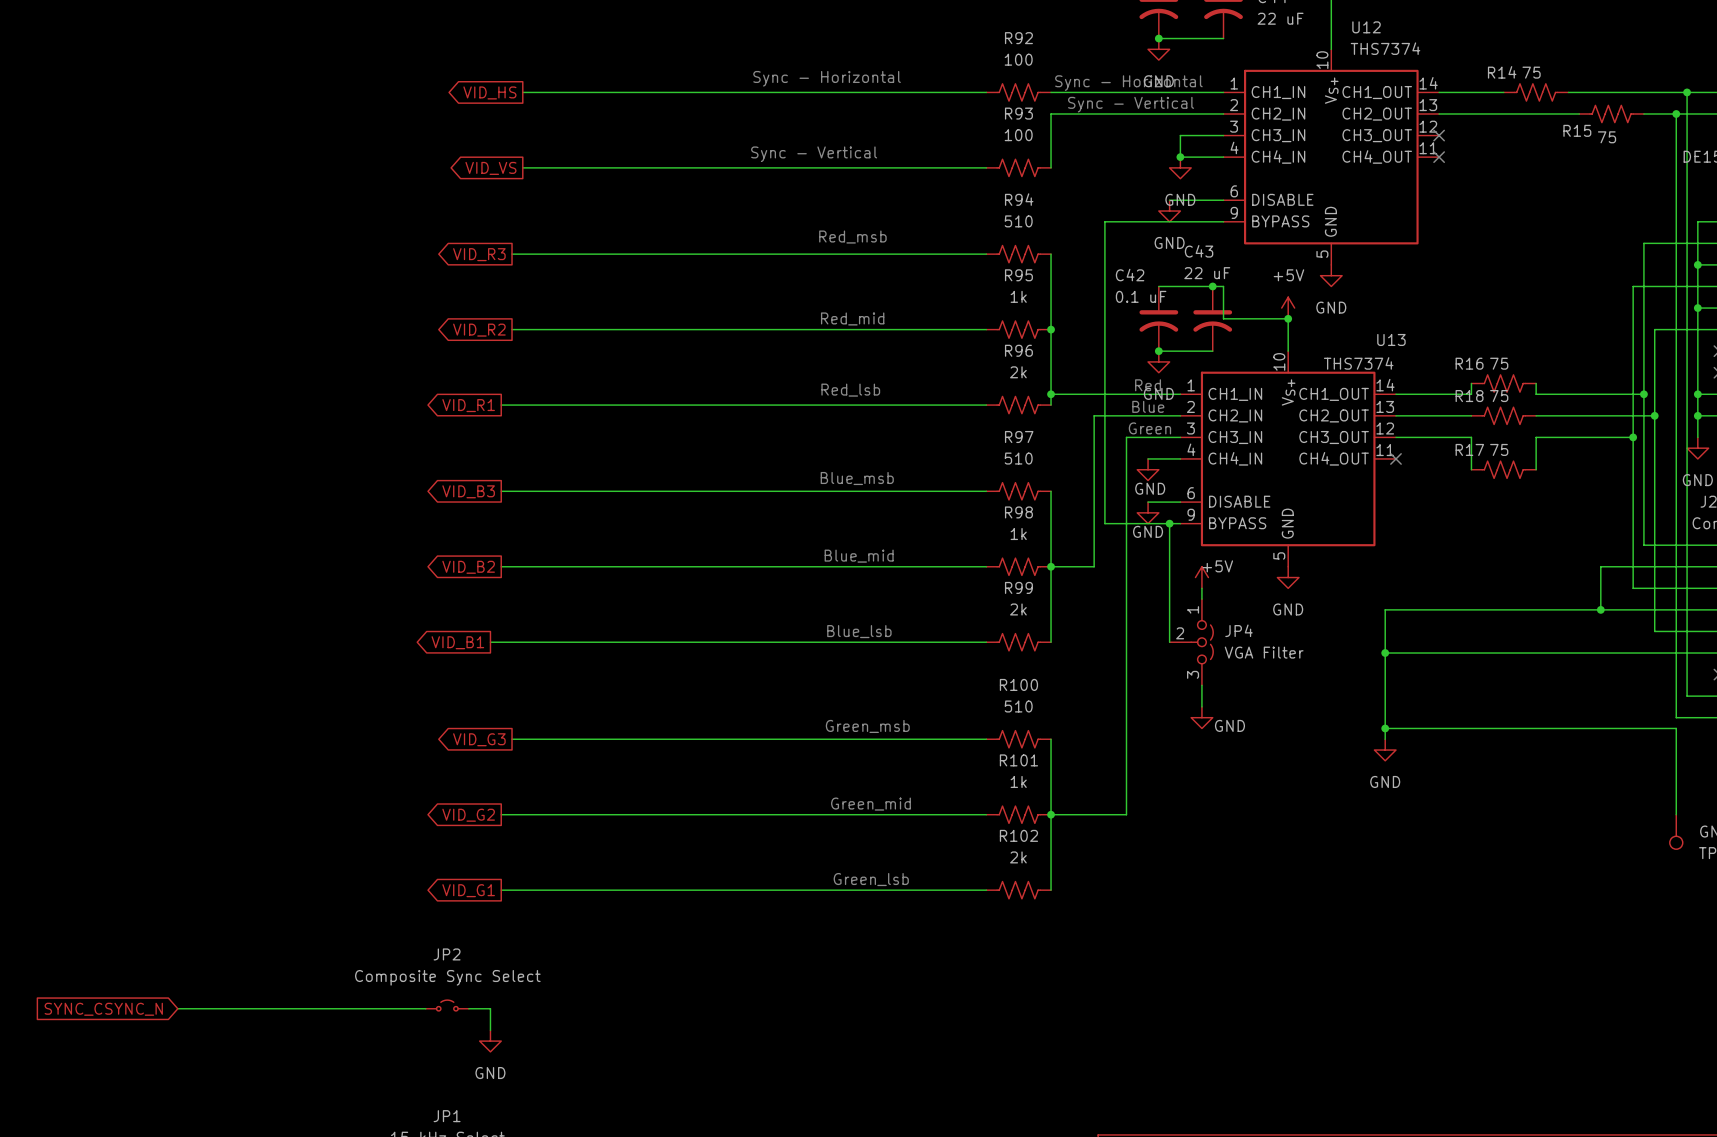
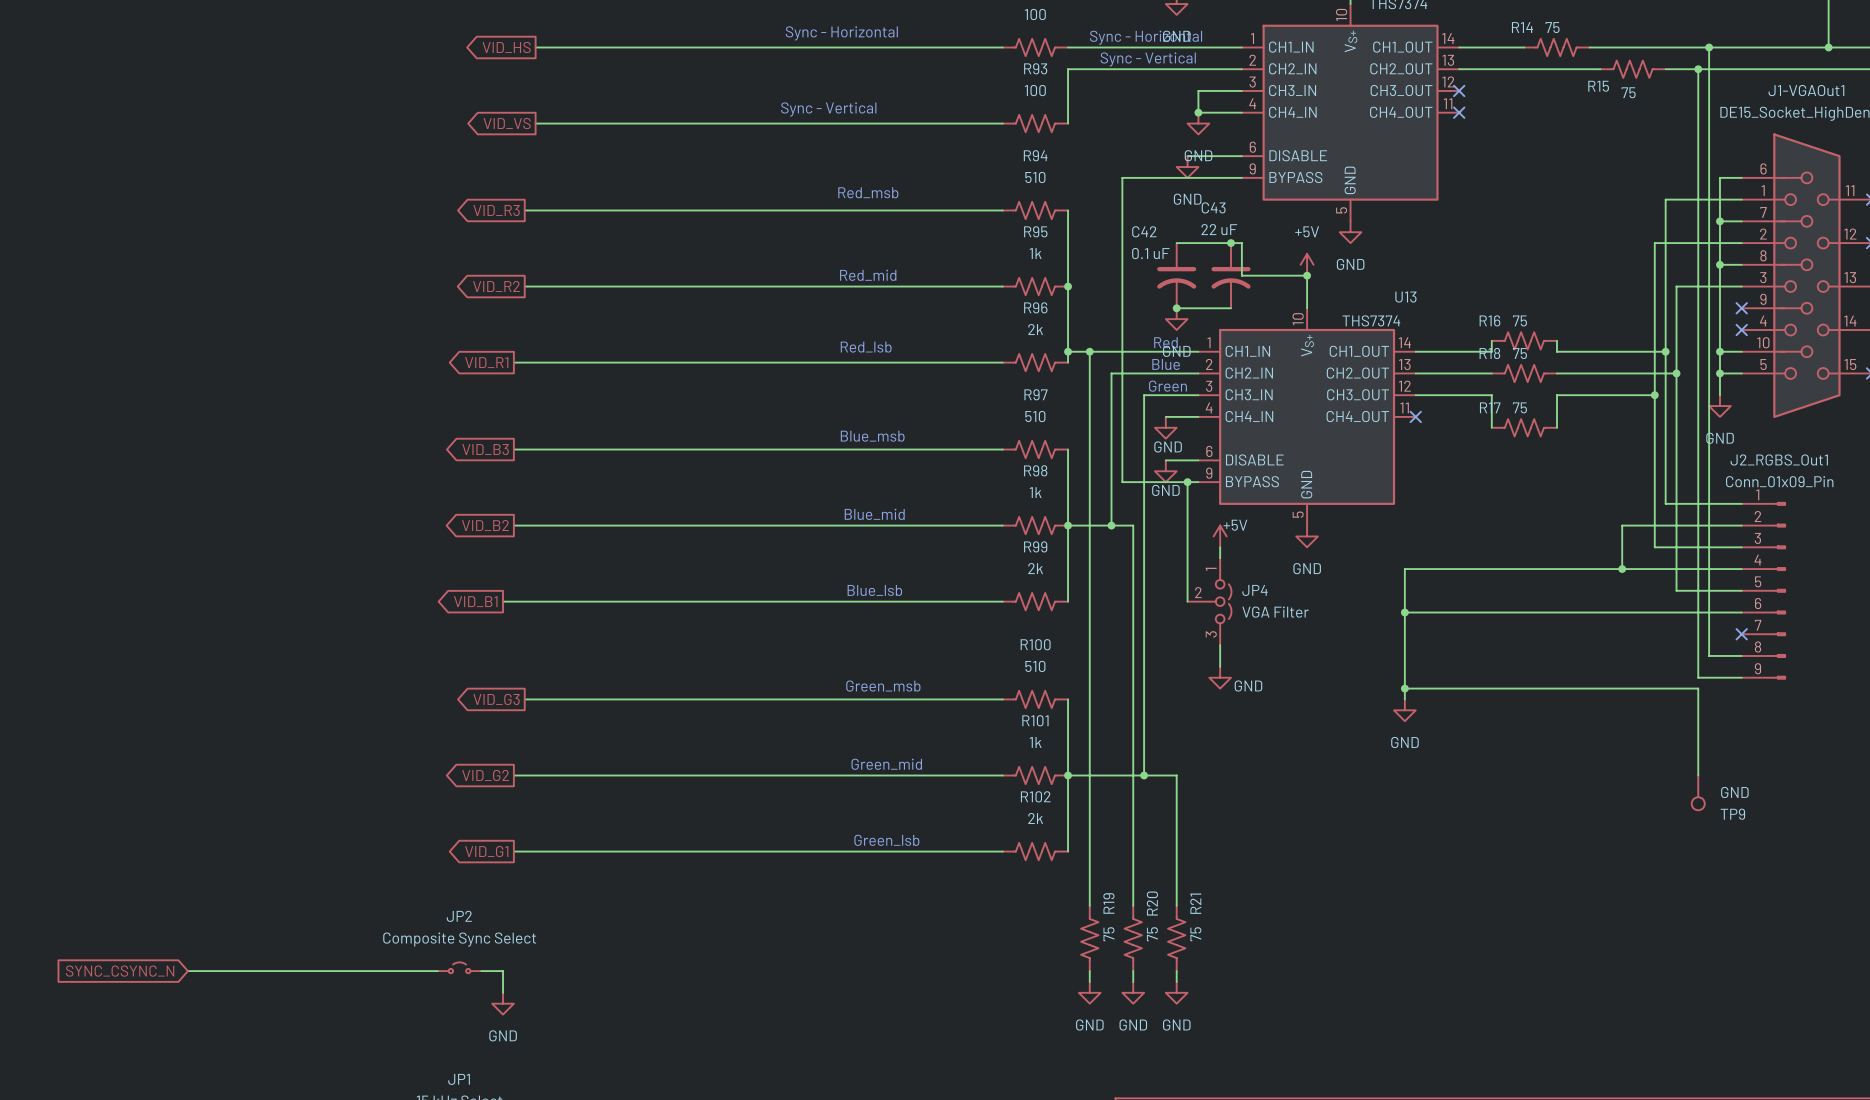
wire: none -> (1089, 351) (1089, 905)
junction: none -> (1089, 351)
wire: none -> (1111, 525) (1133, 525) (1133, 905)
junction: none -> (1111, 525)
wire: none -> (1144, 775) (1176, 775) (1176, 905)
junction: none -> (1144, 775)
R19: none -> 75 (1089, 938)
R20: none -> 75 (1133, 938)
R21: none -> 75 (1176, 938)
wire: none -> (1089, 971) (1089, 981)
wire: none -> (1133, 971) (1133, 981)
wire: none -> (1176, 971) (1176, 981)
power symbol: none -> GND (1089, 992)
power symbol: none -> GND (1133, 992)
power symbol: none -> GND (1176, 992)

